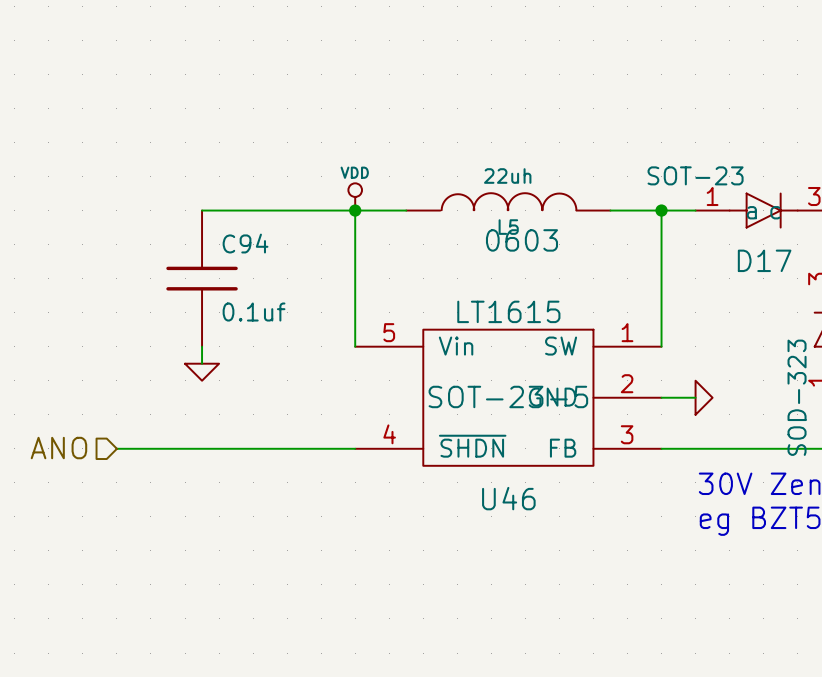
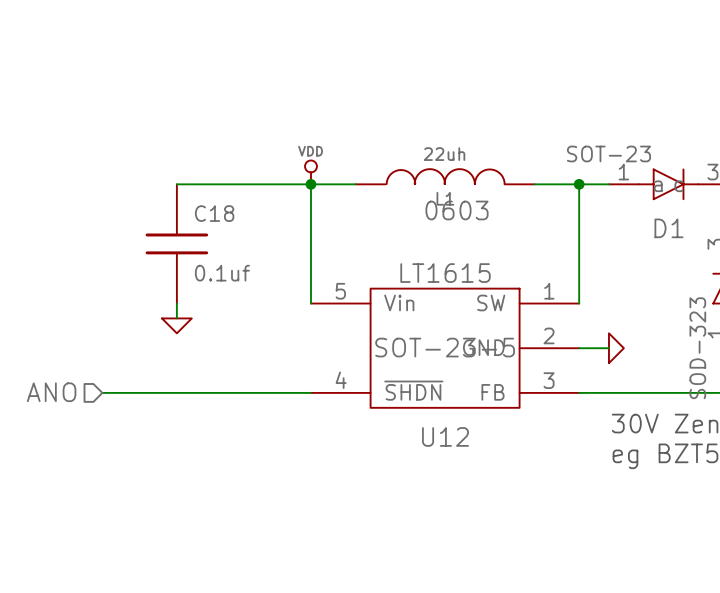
L5 name: L5 (508, 227) -> L1 (445, 198)
C94 name: C94 (245, 243) -> C18 (214, 213)
D17 name: D17 (764, 260) -> D1 (669, 228)
U46 name: U46 (508, 498) -> U12 (445, 436)

